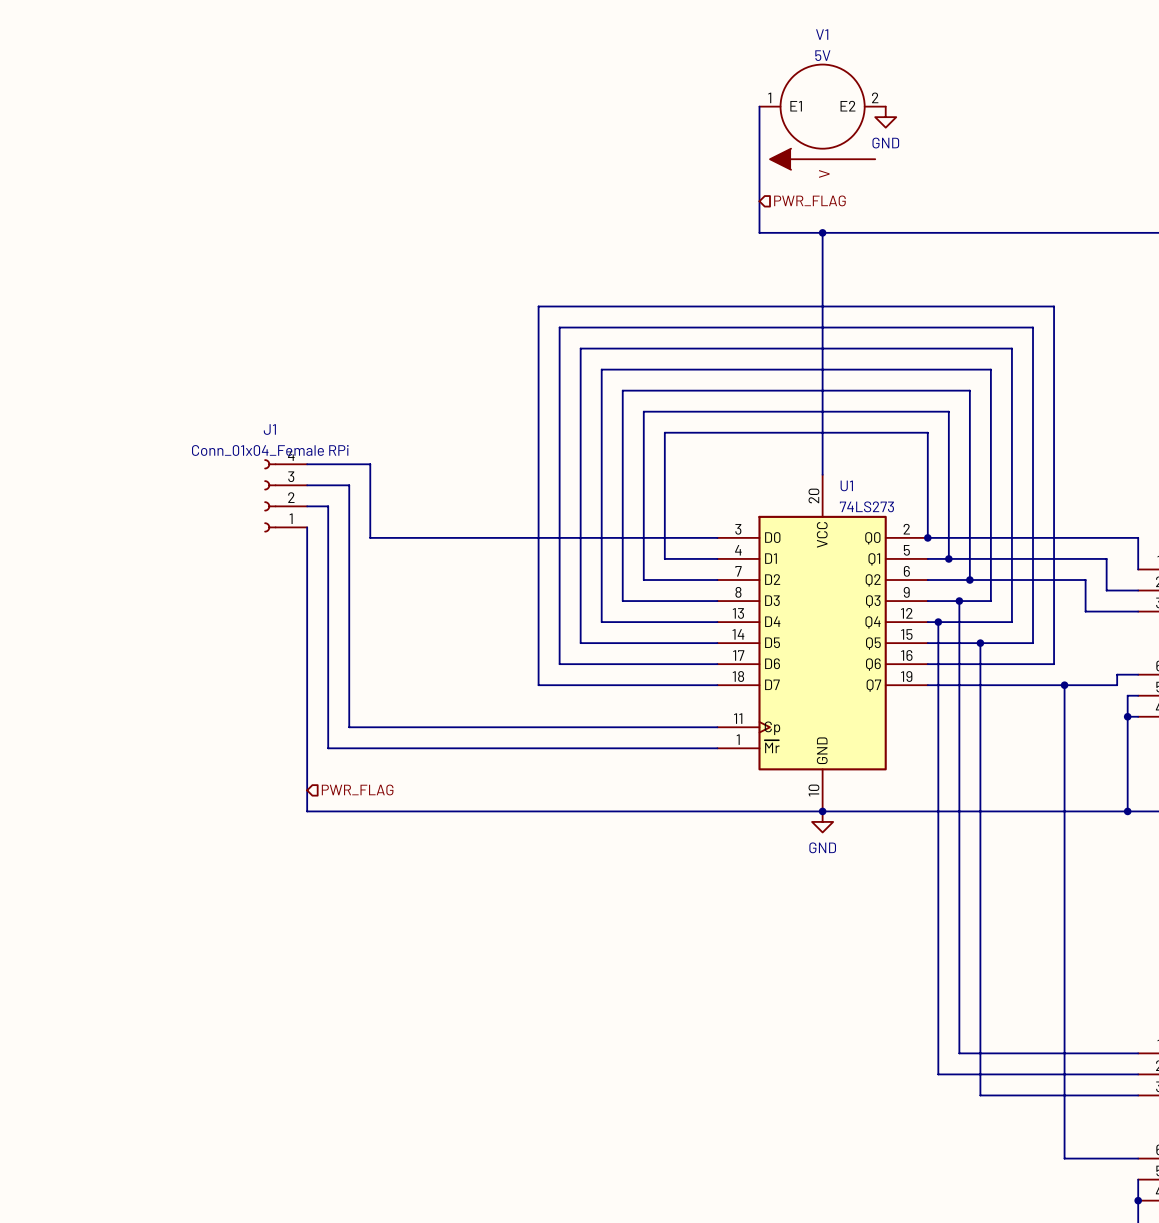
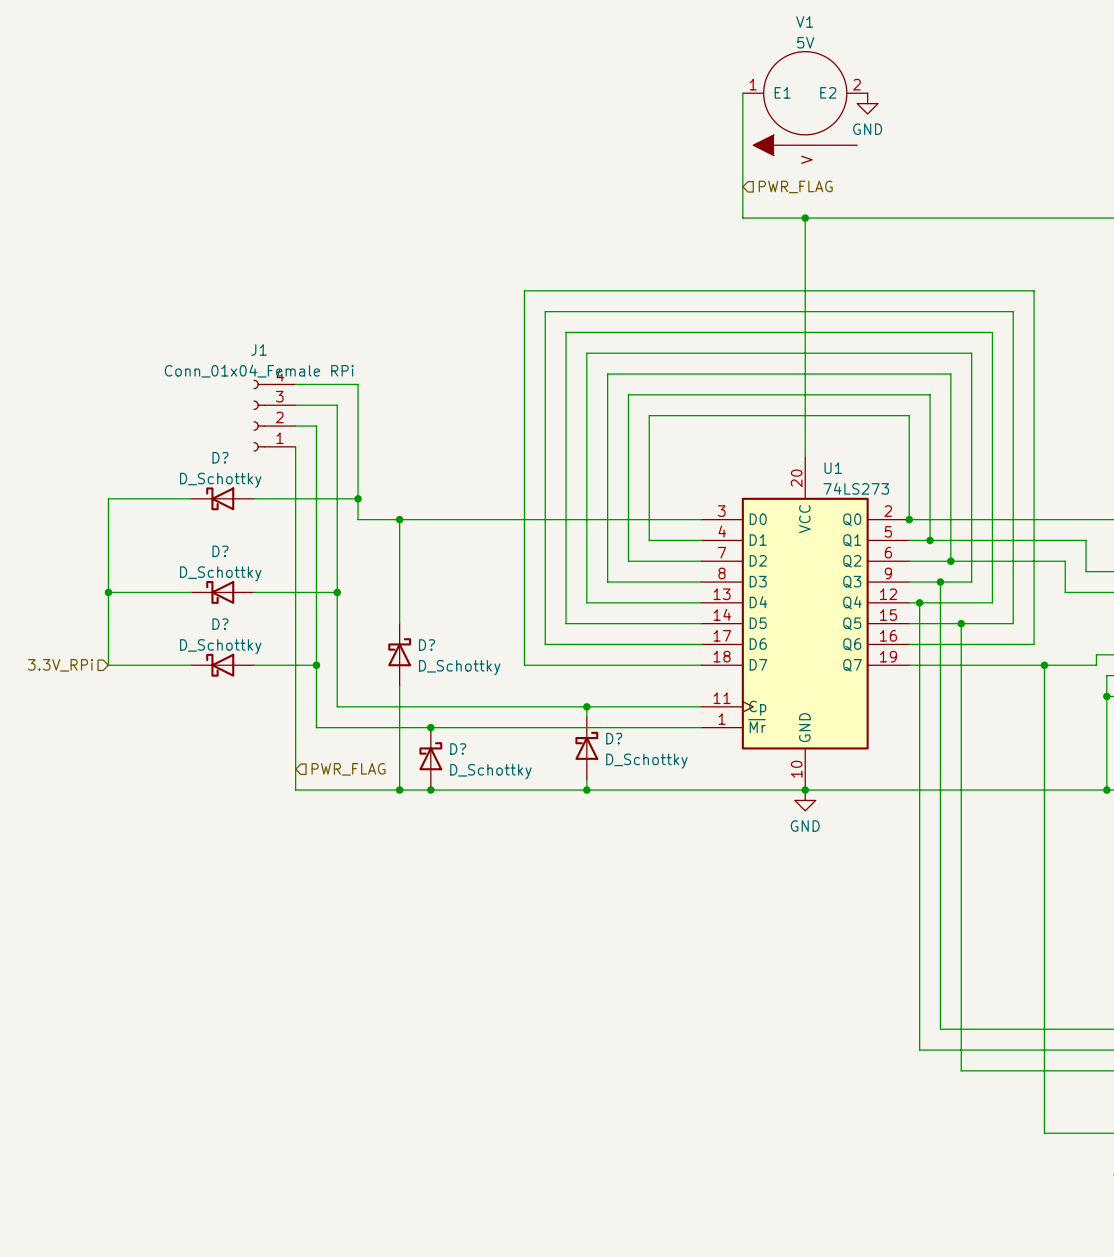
wire: (307, 464) (370, 464) -> (295, 384) (358, 384) (358, 446)
wire: none -> (295, 446) (295, 509)
wire: (307, 485) (349, 485) -> (295, 405) (337, 405) (337, 467)
J1 position: (285, 495) -> (274, 415)
wire: (307, 506) (328, 506) -> (295, 426) (316, 426) (316, 488)
wire: none -> (191, 498) (108, 498) (108, 665) (191, 665)
D?: none -> D_Schottky (222, 498)
wire: none -> (254, 498) (358, 498)
junction: none -> (358, 498)
wire: none -> (399, 519) (399, 623)
junction: none -> (399, 519)
wire: none -> (108, 592) (191, 592)
junction: none -> (108, 592)
D?: none -> D_Schottky (222, 592)
wire: none -> (254, 592) (337, 592)
junction: none -> (337, 592)
D?: none -> D_Schottky (399, 654)
hierarchical label: none -> 3.3V_RPi (60, 665)
D?: none -> D_Schottky (222, 665)
wire: none -> (254, 665) (316, 665)
junction: none -> (316, 665)
wire: none -> (399, 686) (399, 790)
wire: none -> (586, 706) (586, 717)
junction: none -> (586, 706)
junction: none -> (430, 727)
D?: none -> D_Schottky (586, 748)
D?: none -> D_Schottky (430, 758)
wire: none -> (586, 779) (586, 790)
junction: none -> (399, 790)
junction: none -> (430, 790)
junction: none -> (586, 790)

